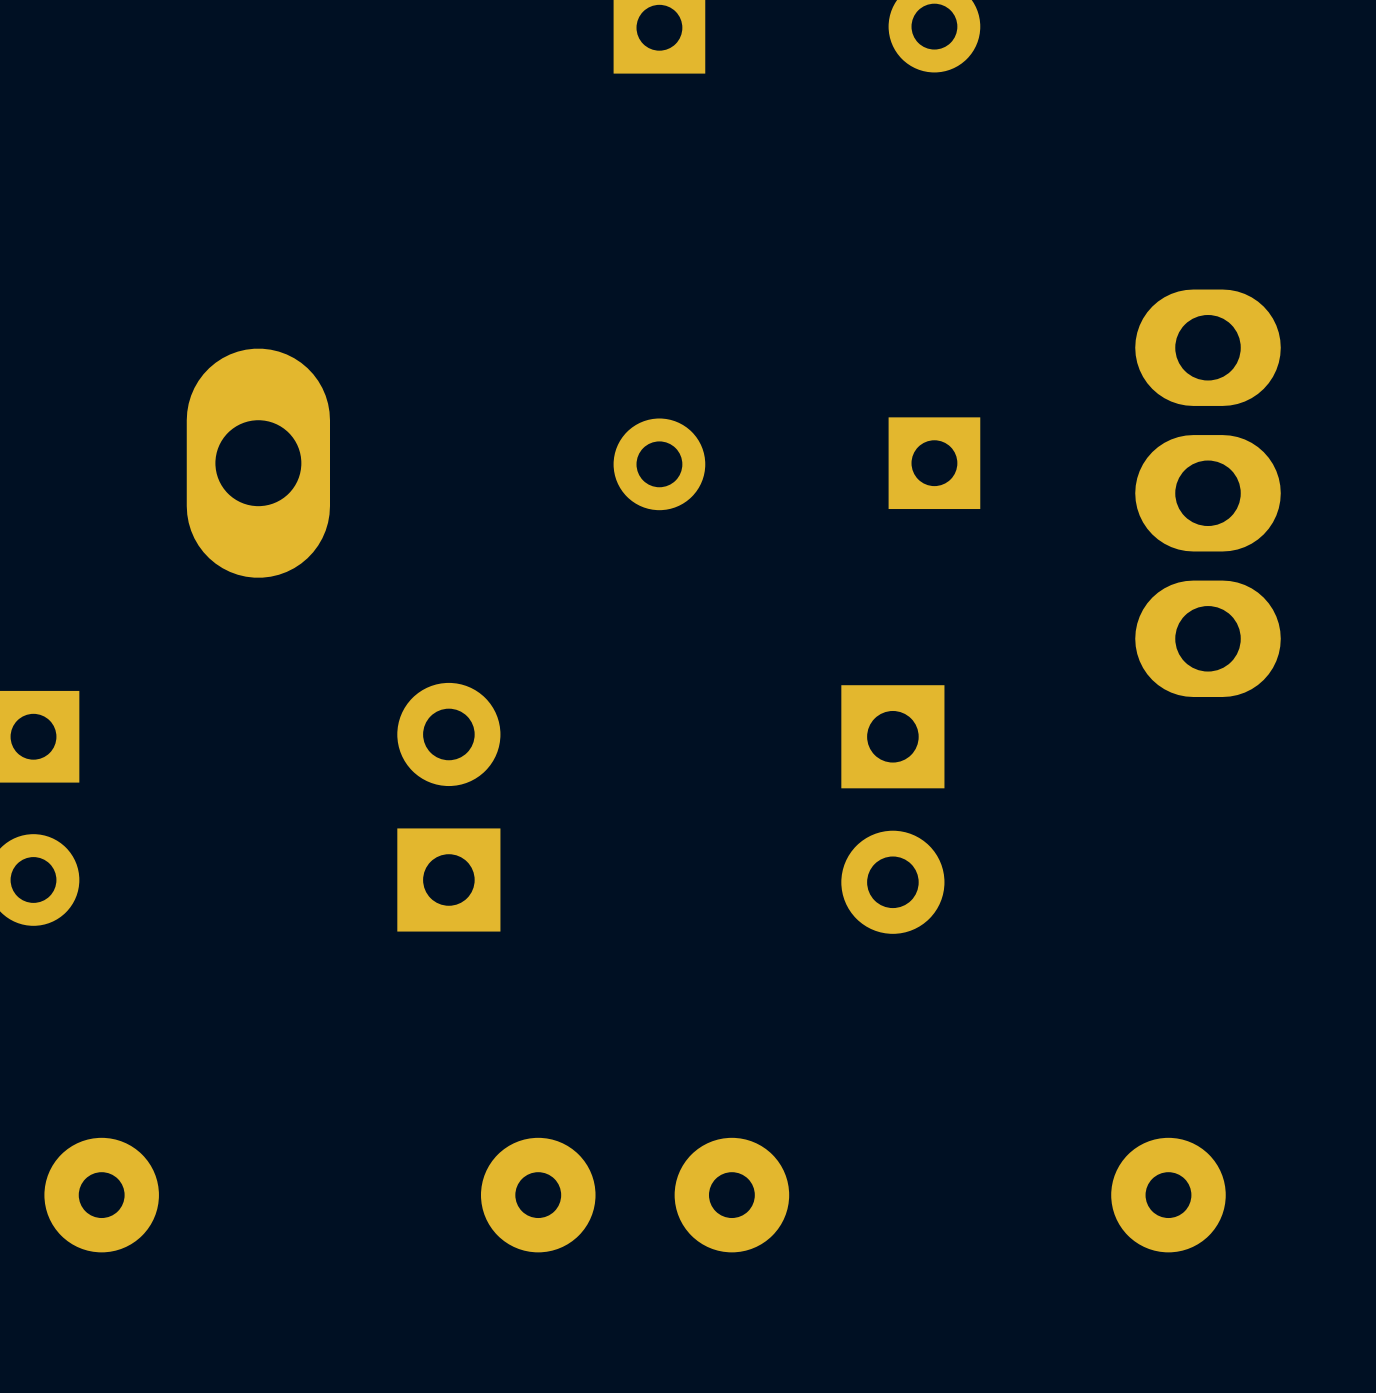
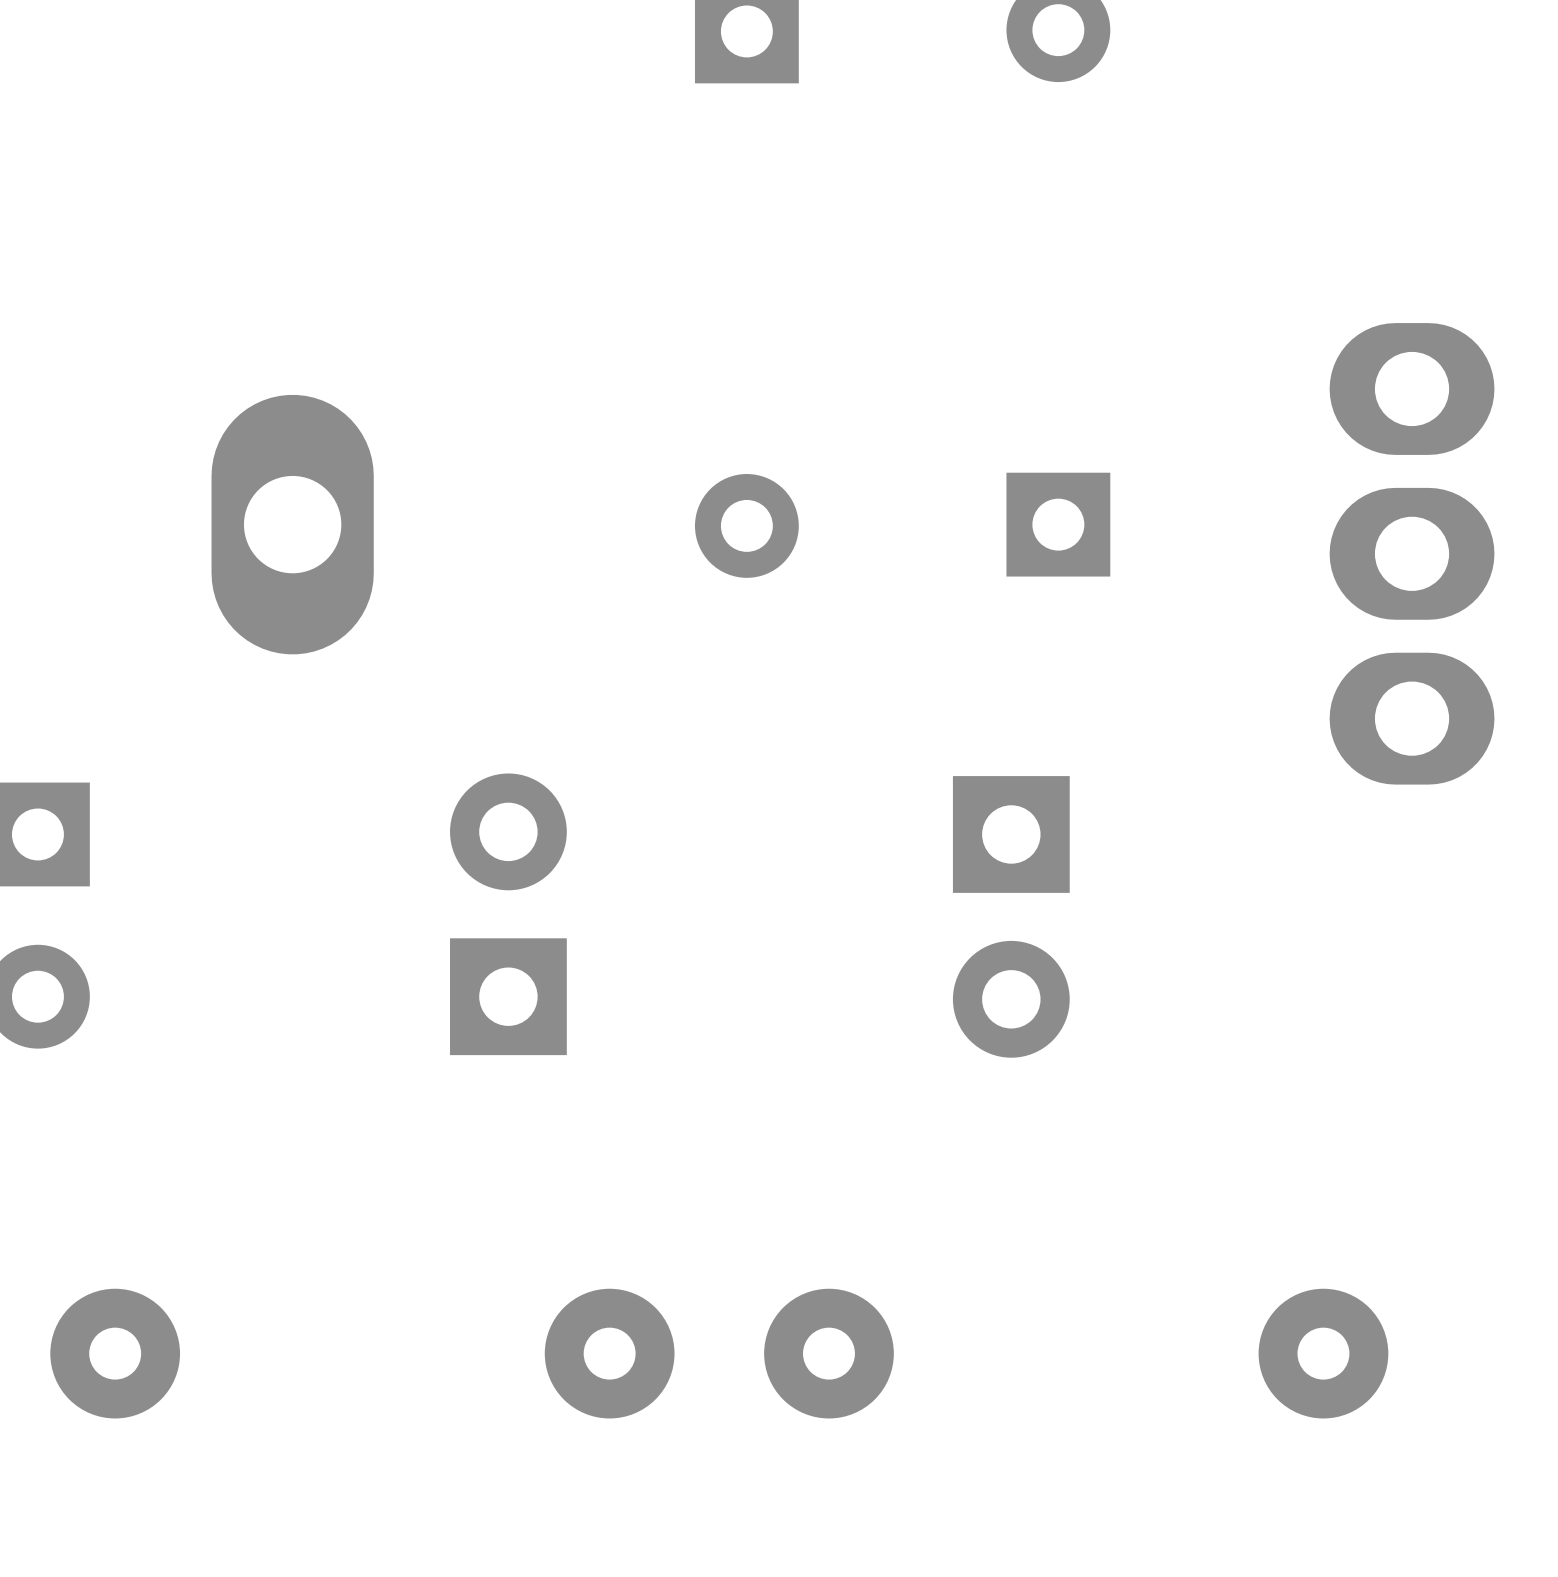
part position: (1208, 493) -> (1412, 553)

